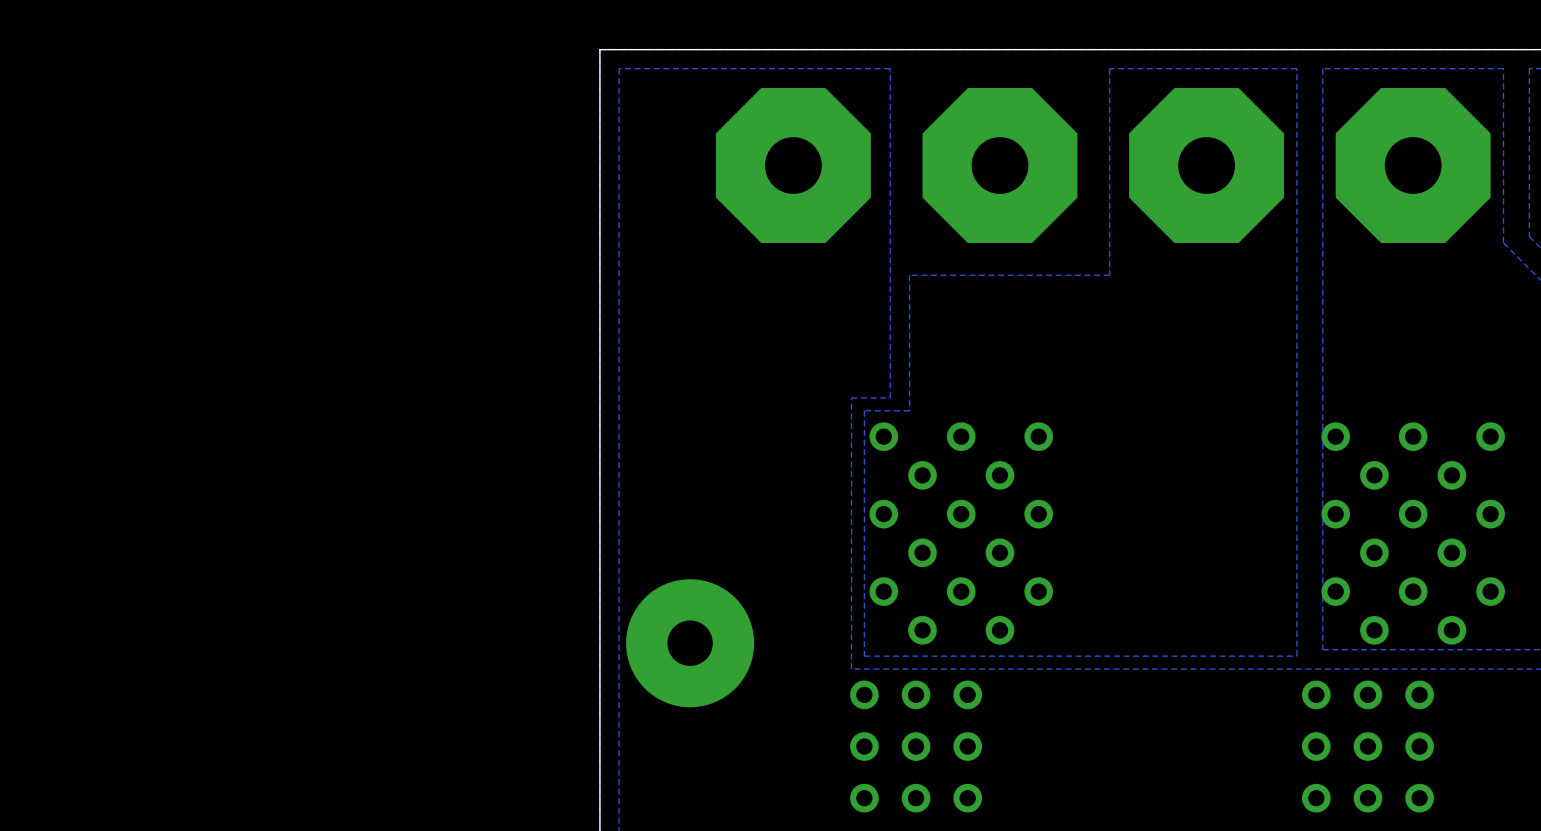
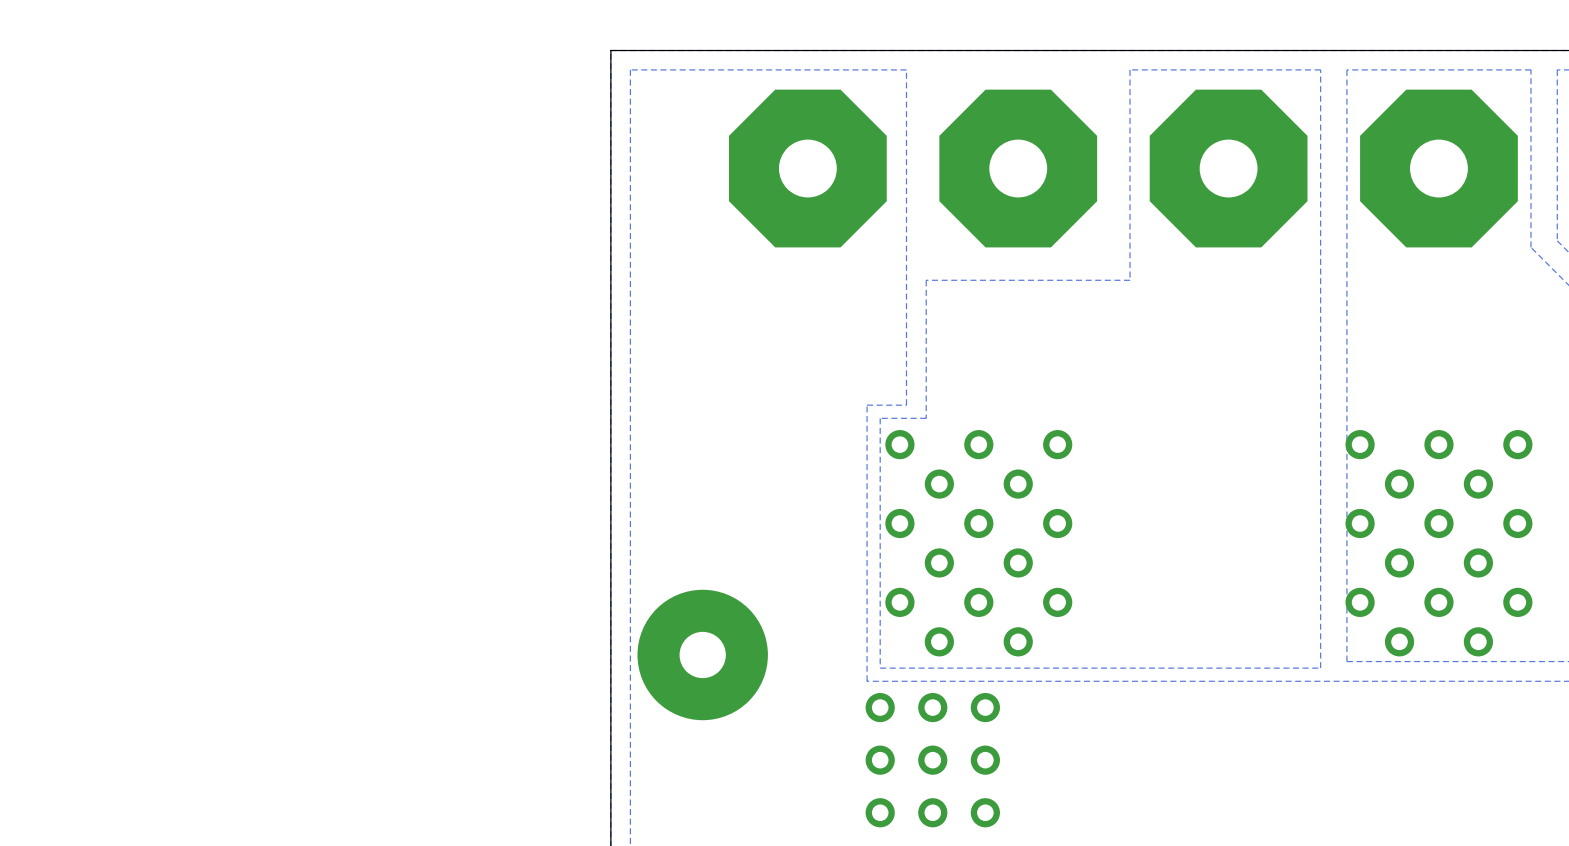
via: (1316, 694) -> none
via: (1367, 694) -> none
via: (1419, 694) -> none
via: (1316, 746) -> none
via: (1367, 746) -> none
via: (1419, 746) -> none
via: (1316, 798) -> none
via: (1367, 798) -> none
via: (1419, 798) -> none

